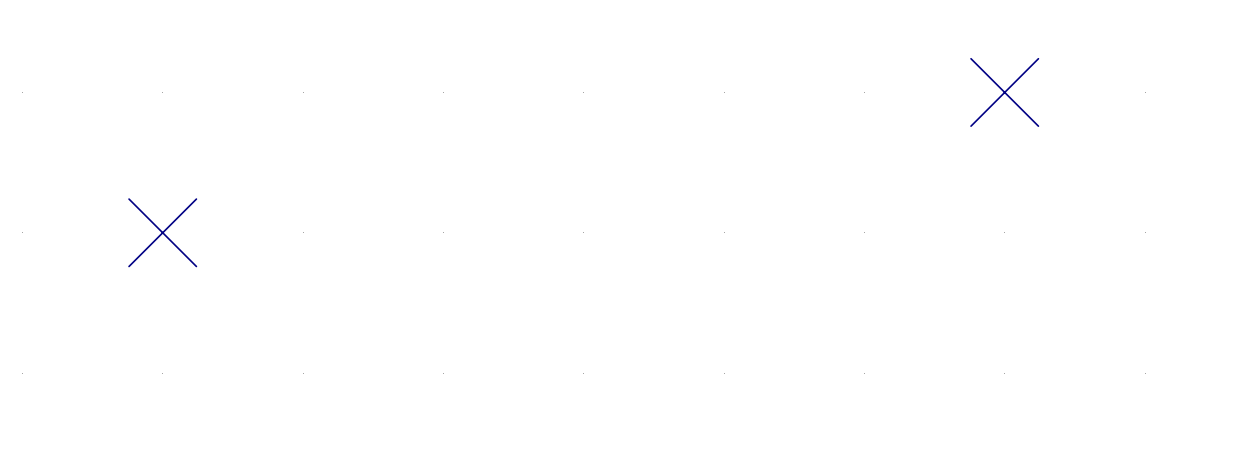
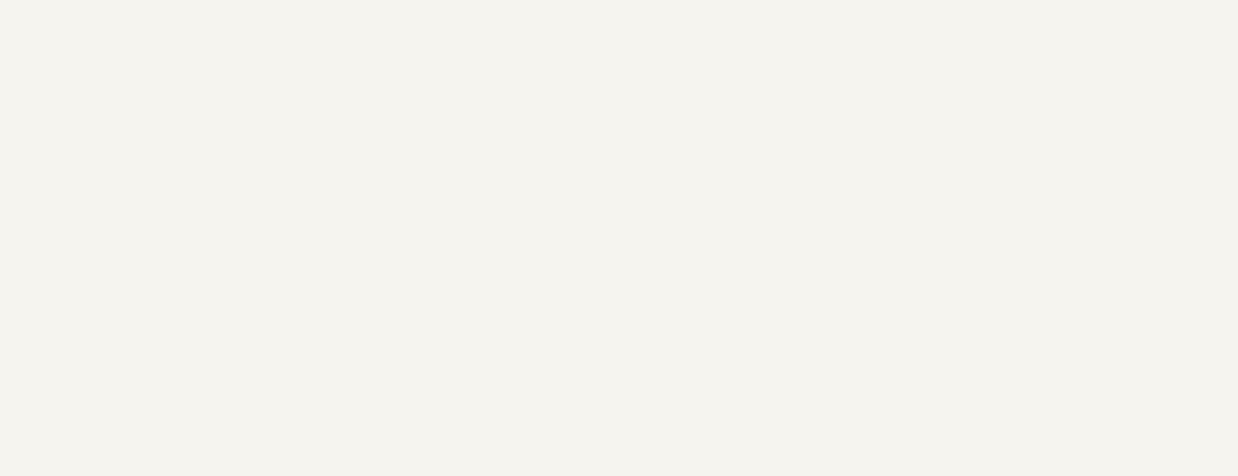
no-connect mark: (1004, 92) -> none
no-connect mark: (162, 232) -> none

